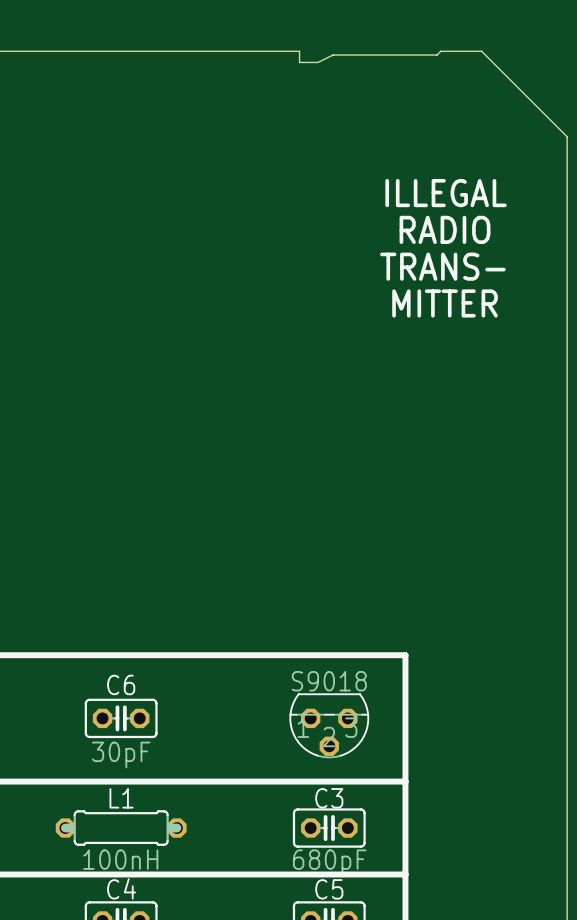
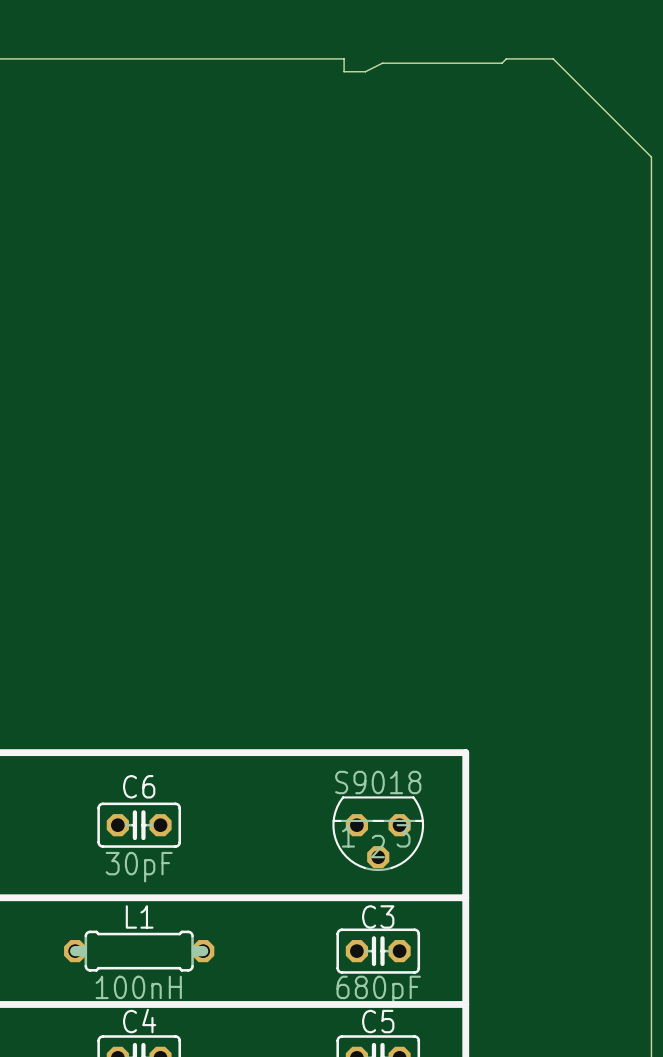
text: ILLEGAL (446, 193) -> none
text: RADIO (445, 229) -> none
text: TRANS- (442, 266) -> none
text: MITTER (445, 303) -> none

